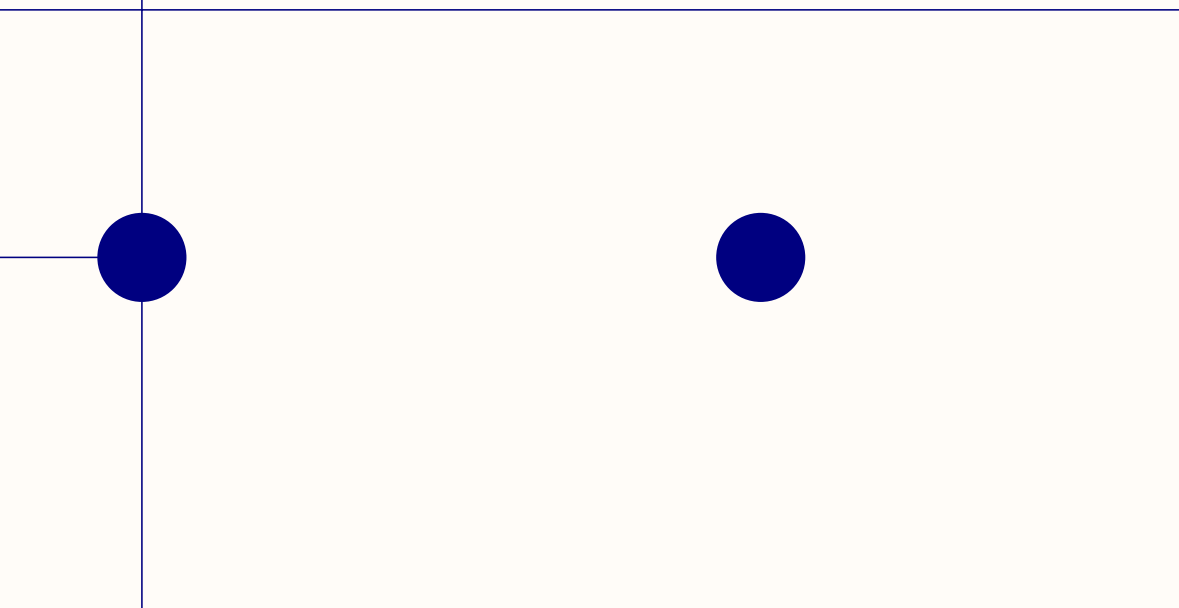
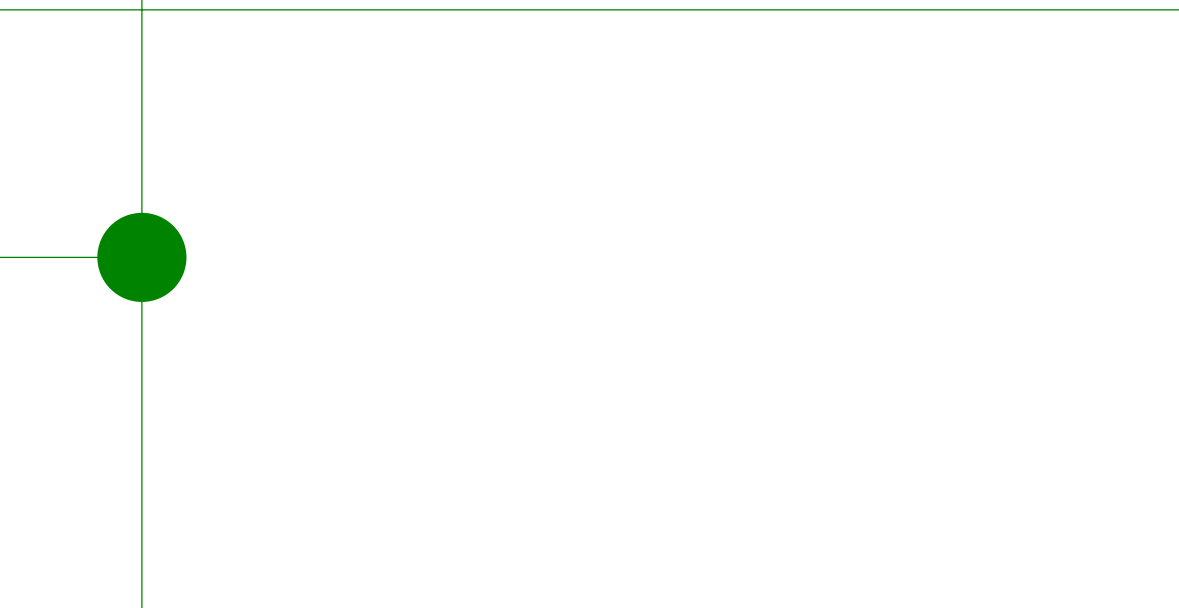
junction: (760, 257) -> none

